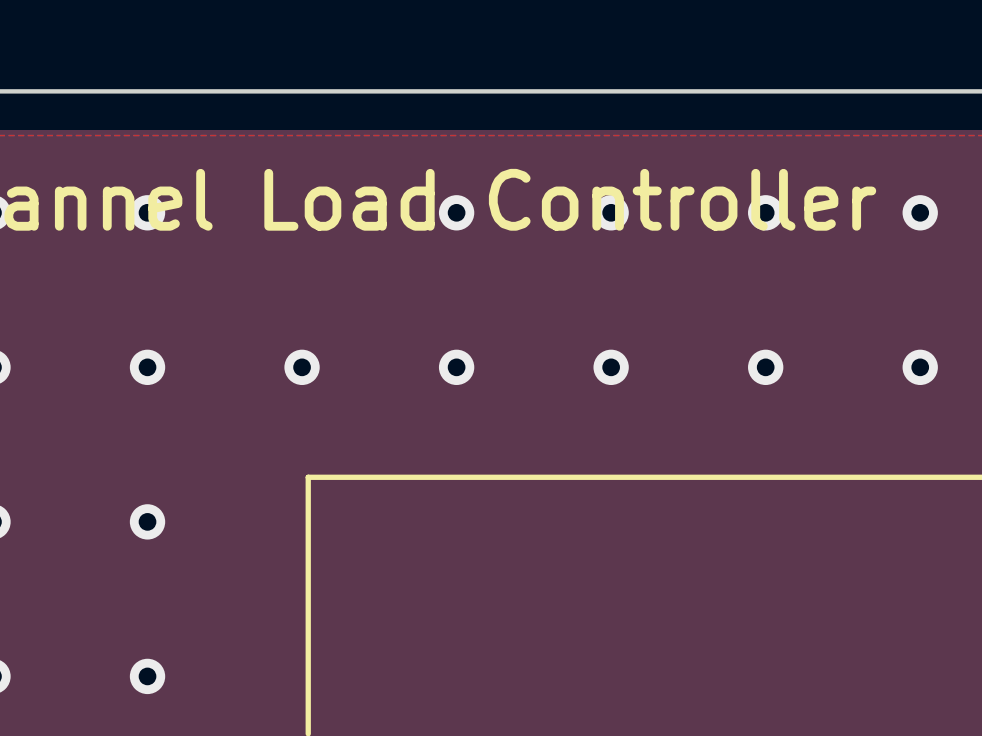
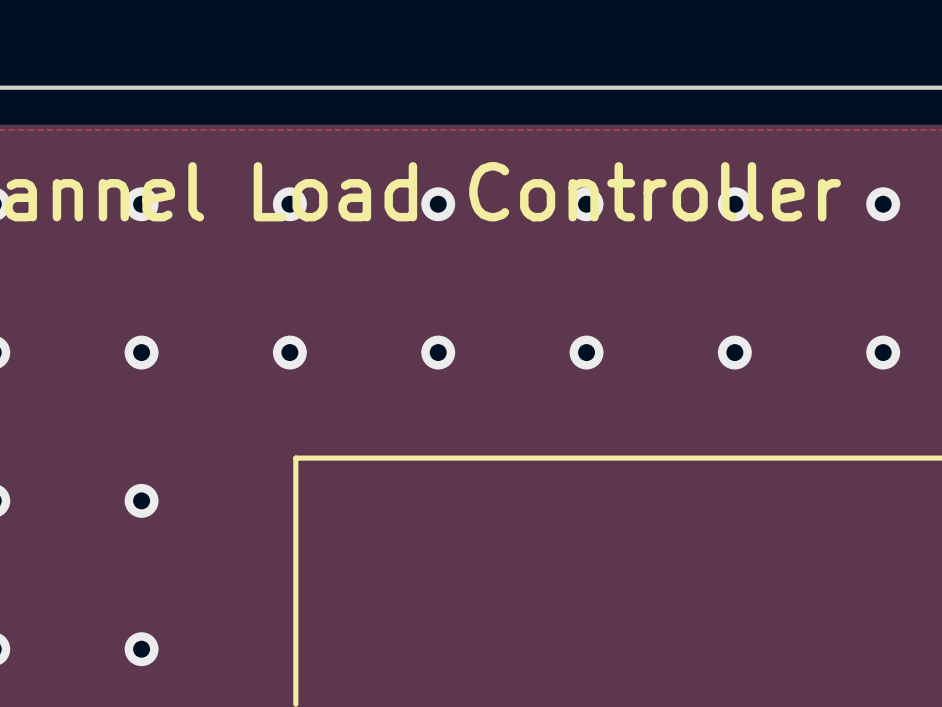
via: none -> (289, 204)

